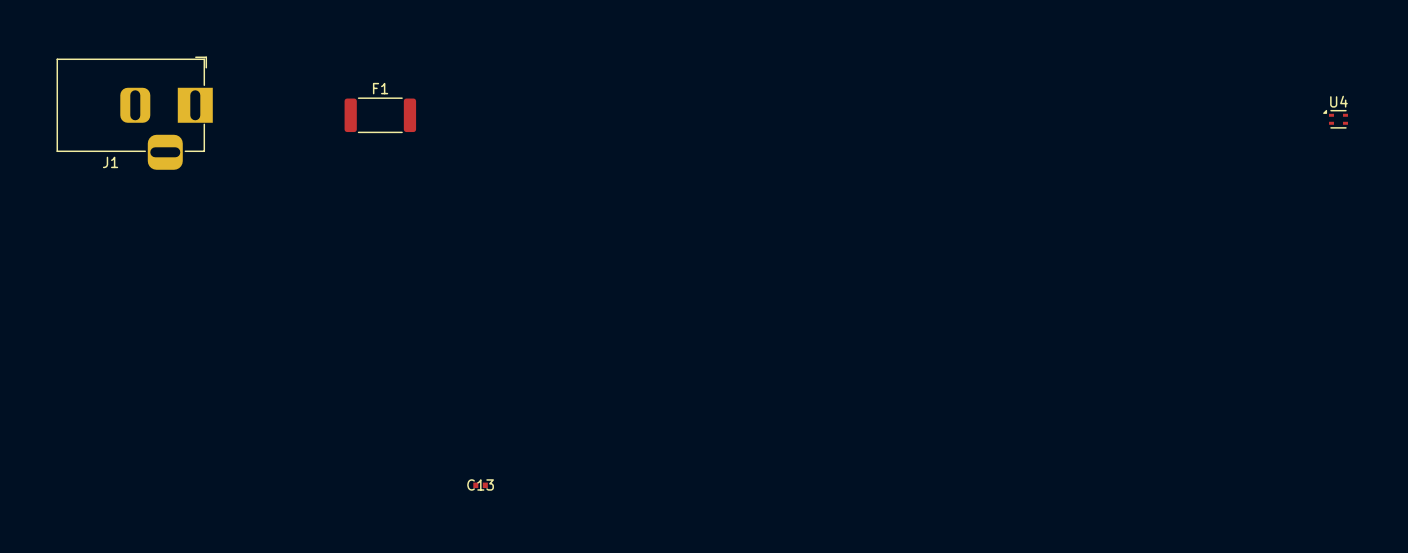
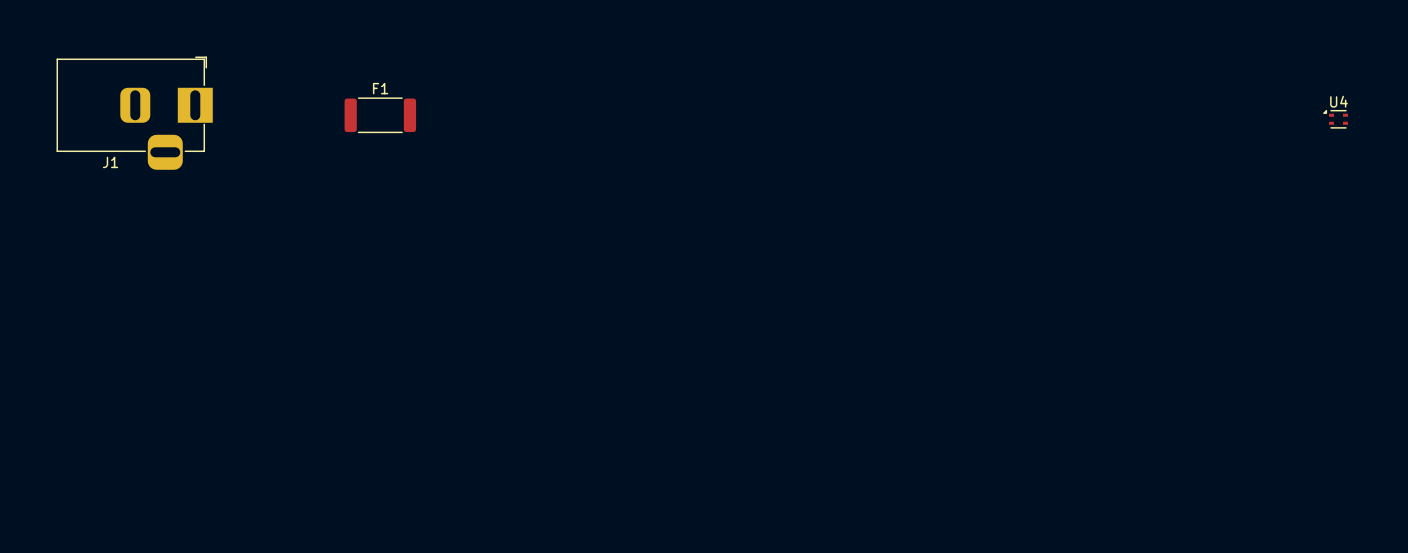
C13: (480, 485) -> none

